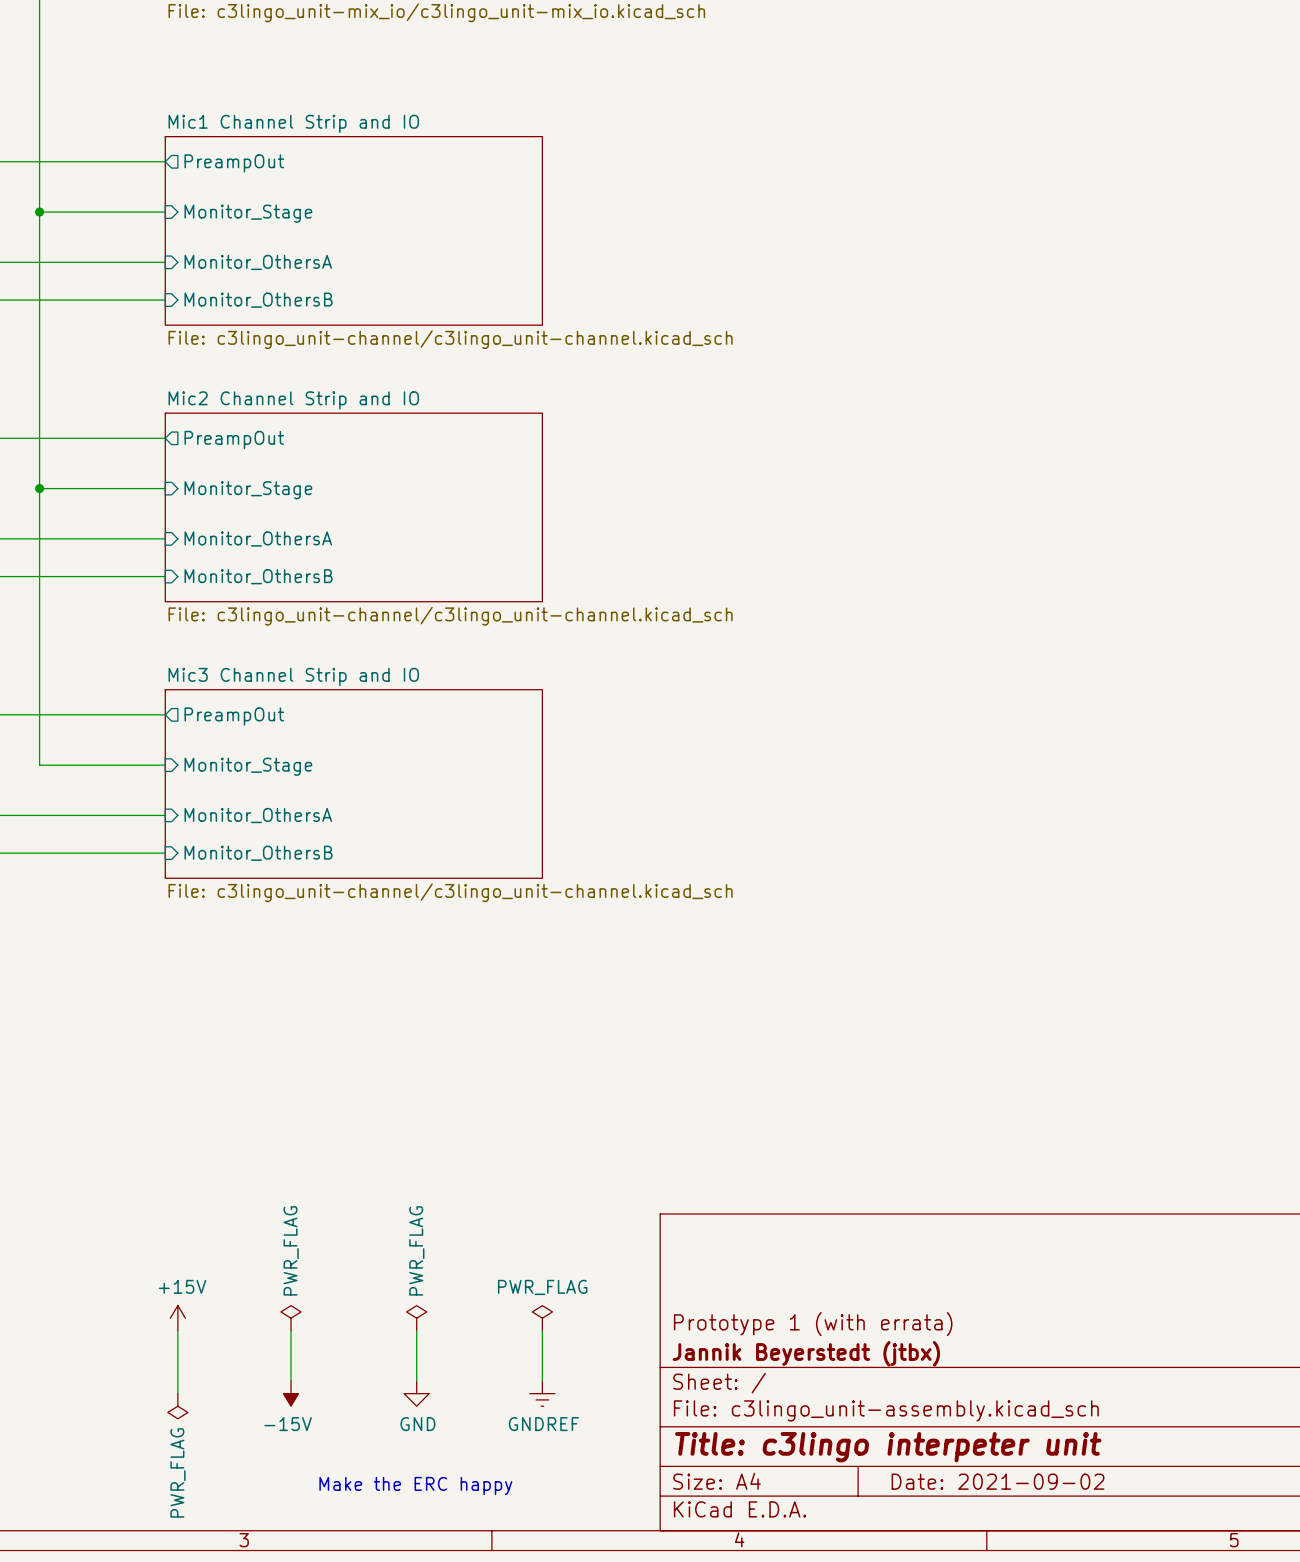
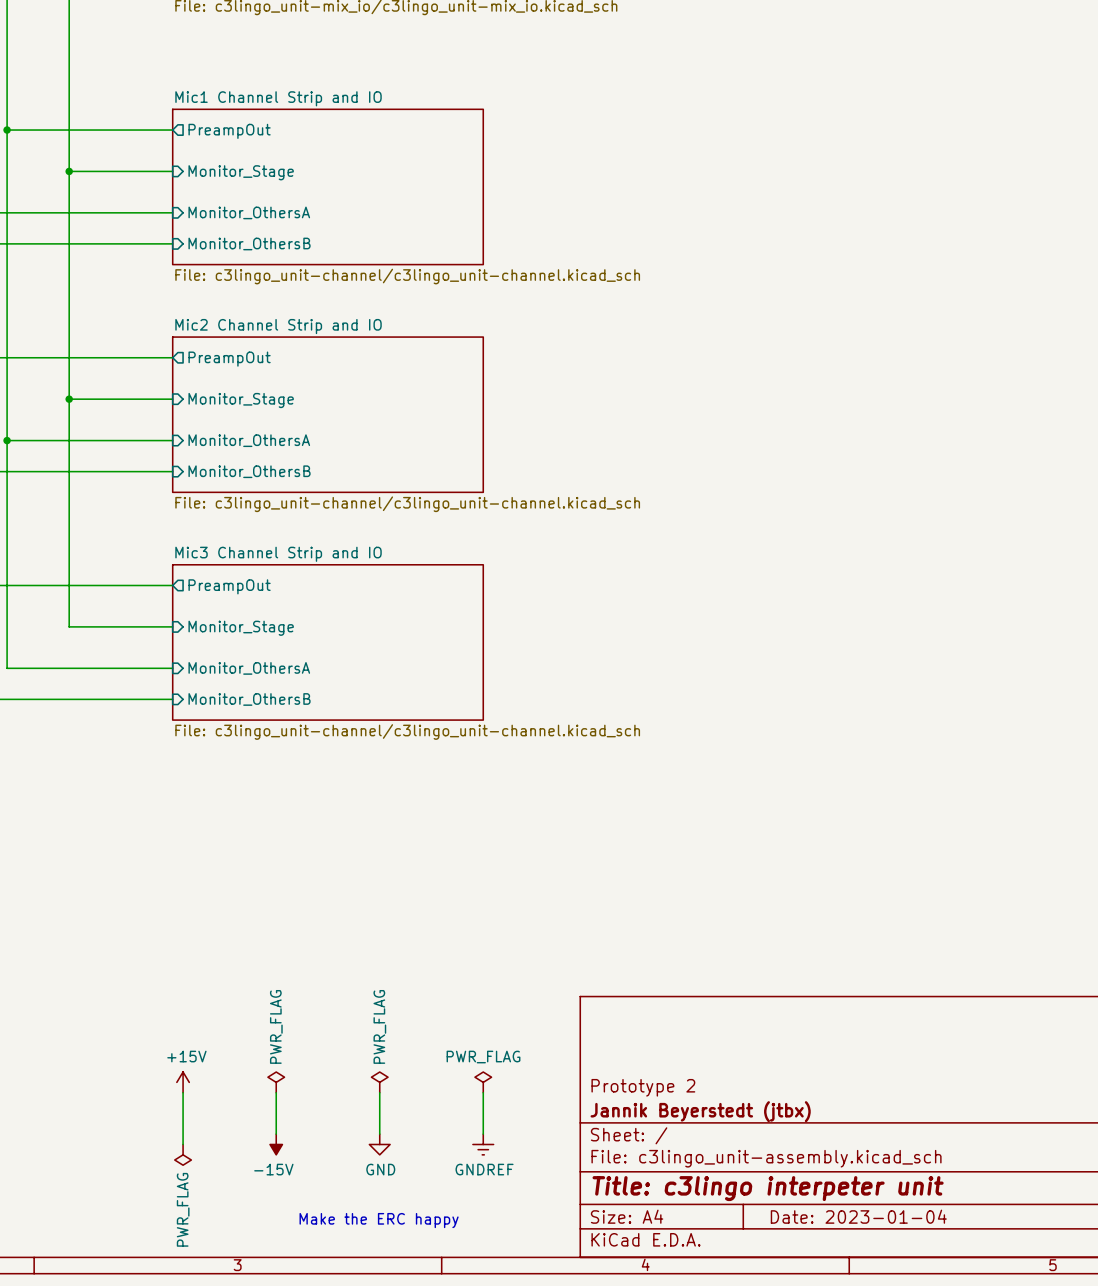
title block: Prototype 1 (with errata) (813, 1324) -> Prototype 2 (643, 1087)
title block: Date: 2021-09-02 (998, 1481) -> Date: 2023-01-04 (858, 1216)

